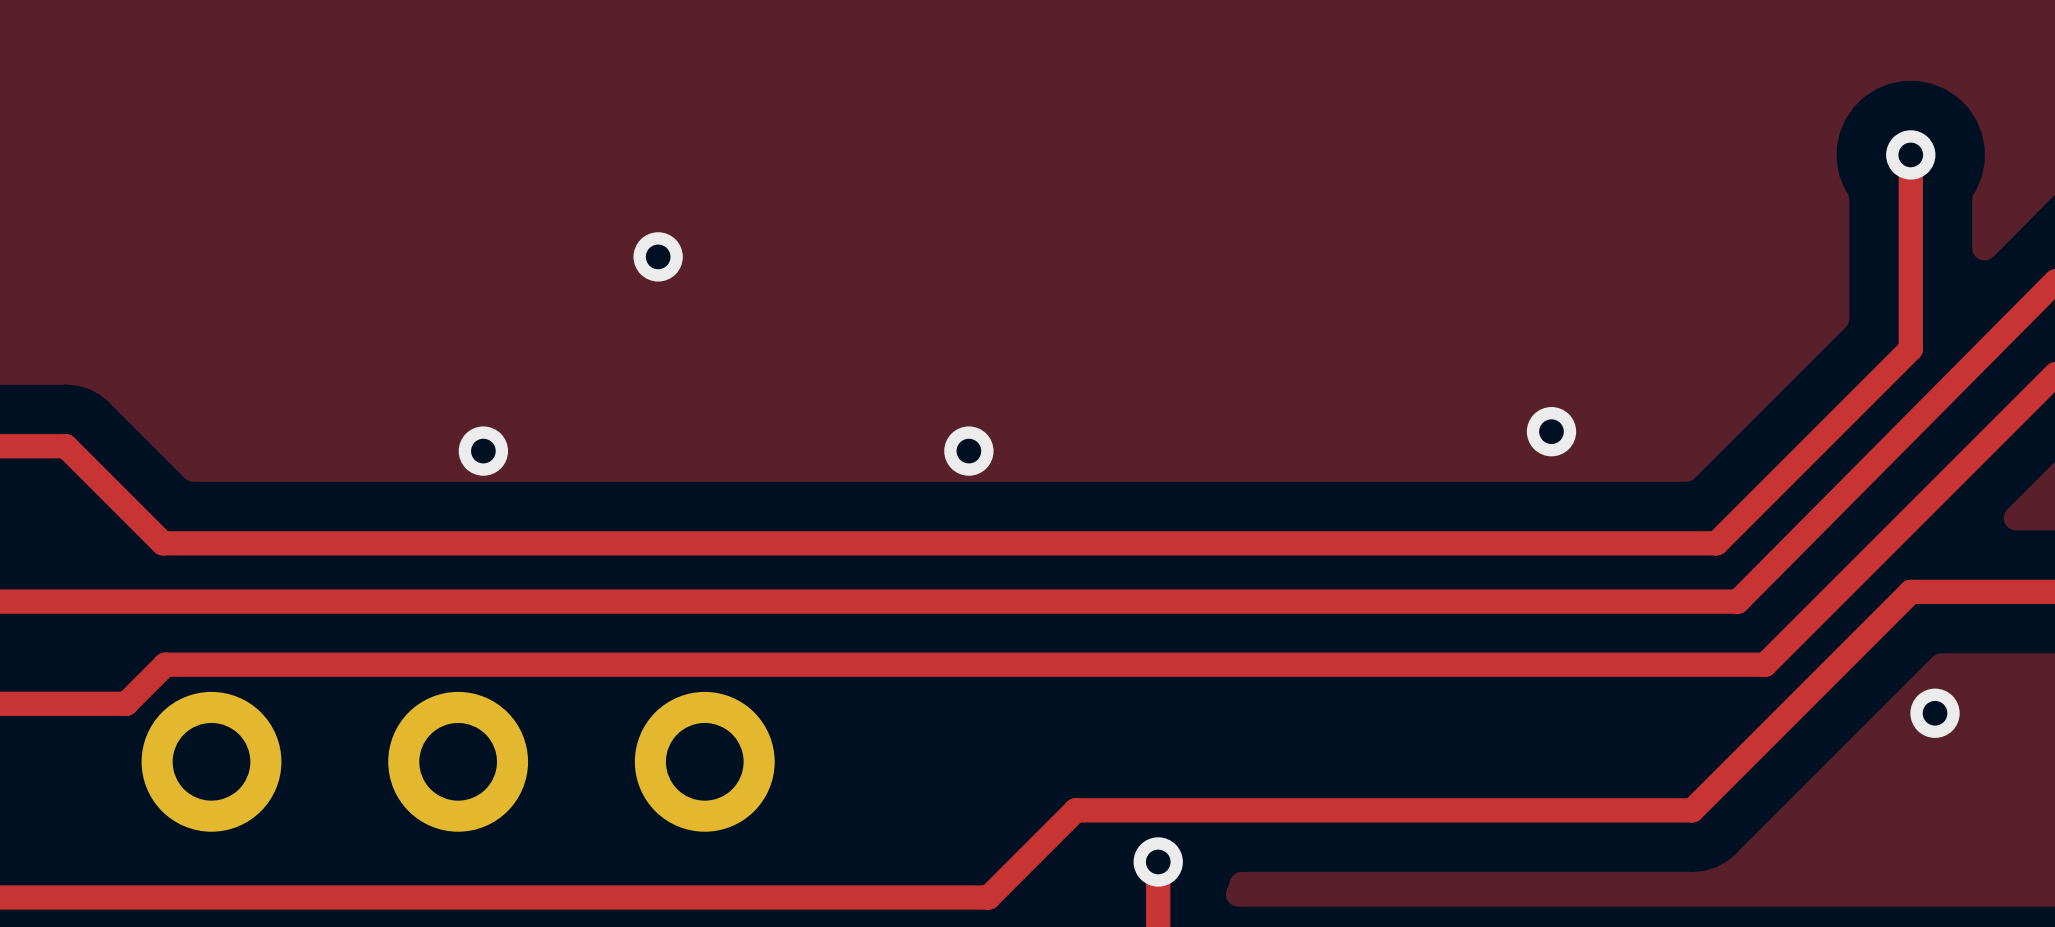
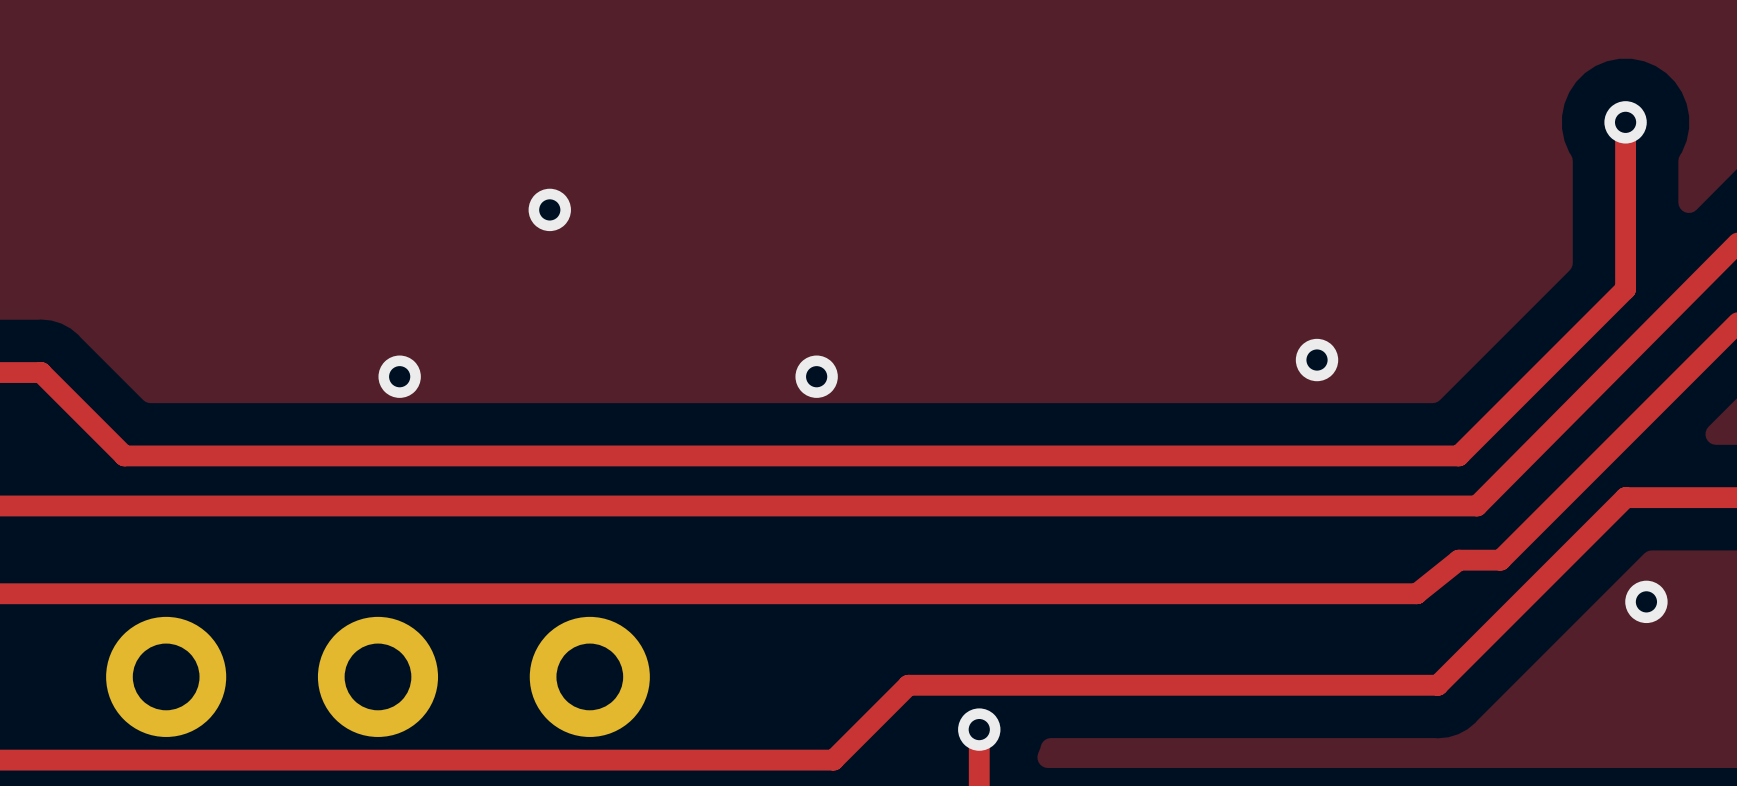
track: (1716, 664) (165, 664) (126, 703) -> (1458, 560) (1417, 593) (92, 593)
part position: (458, 761) -> (377, 676)

